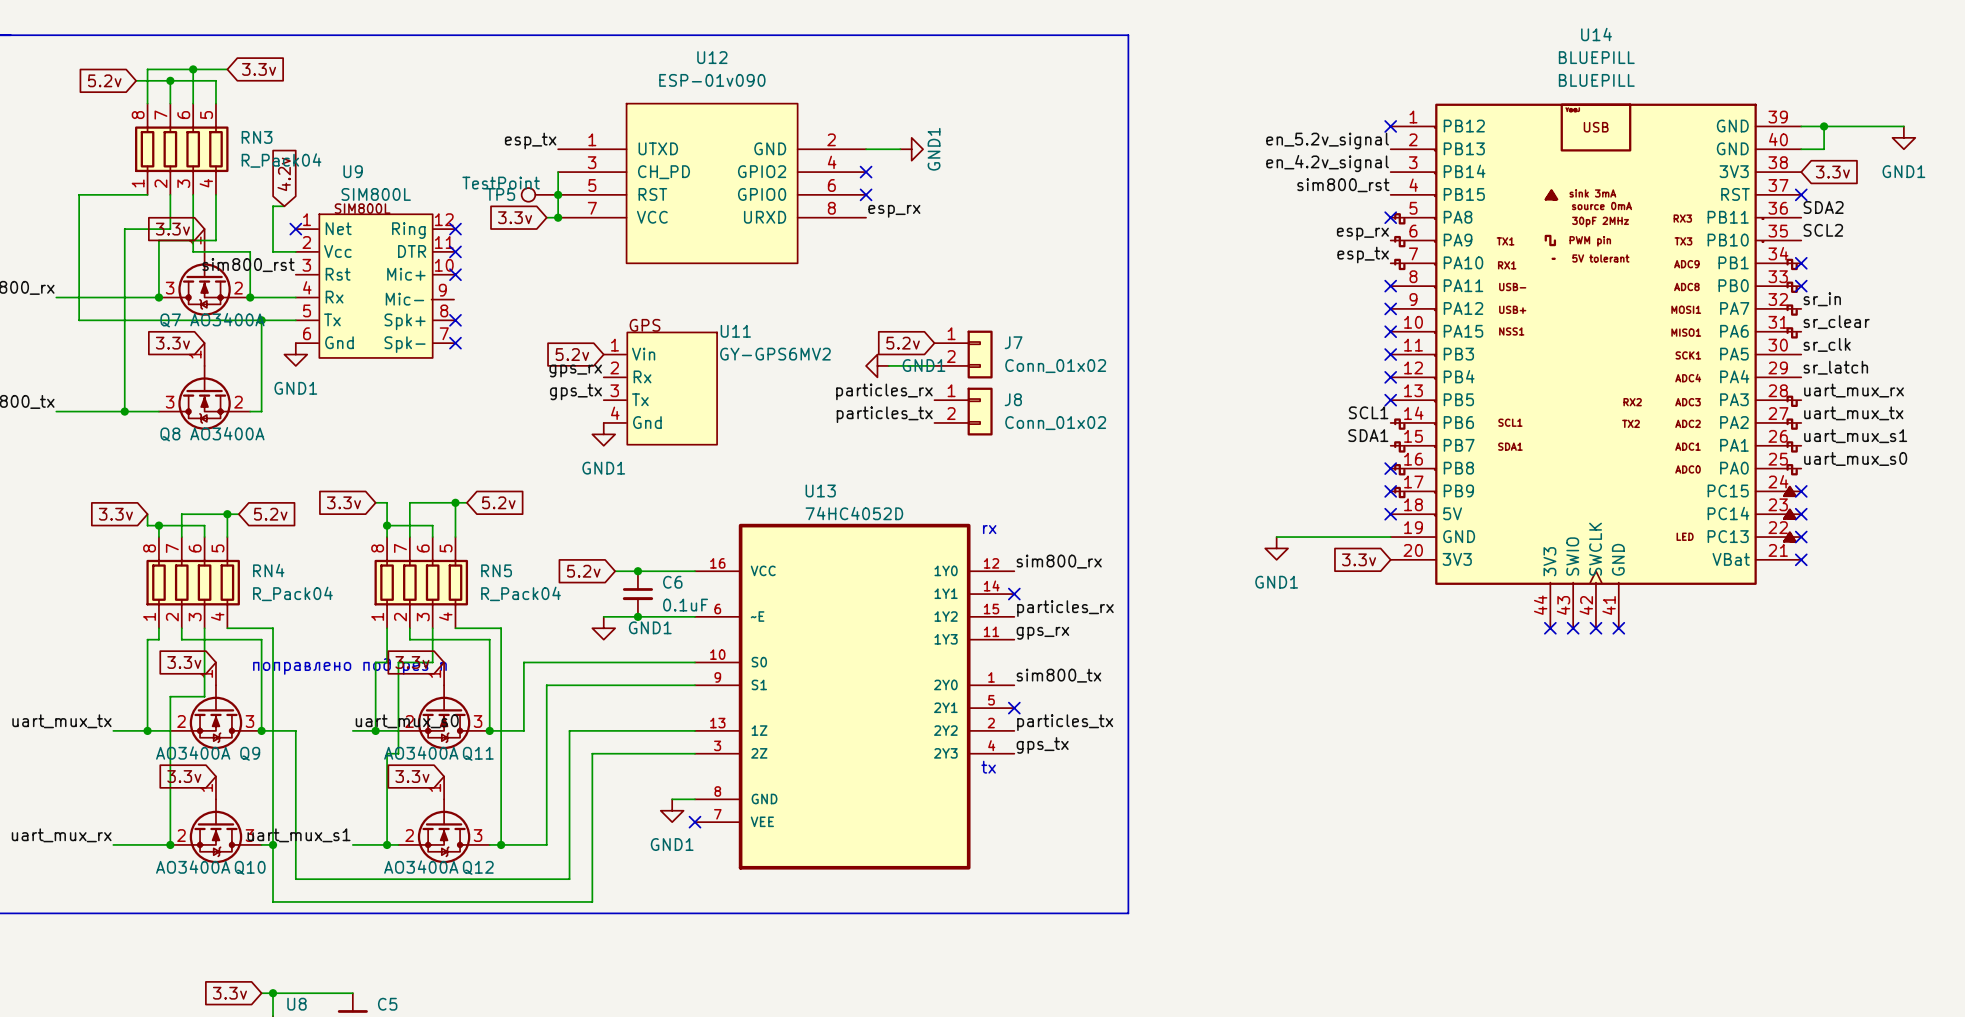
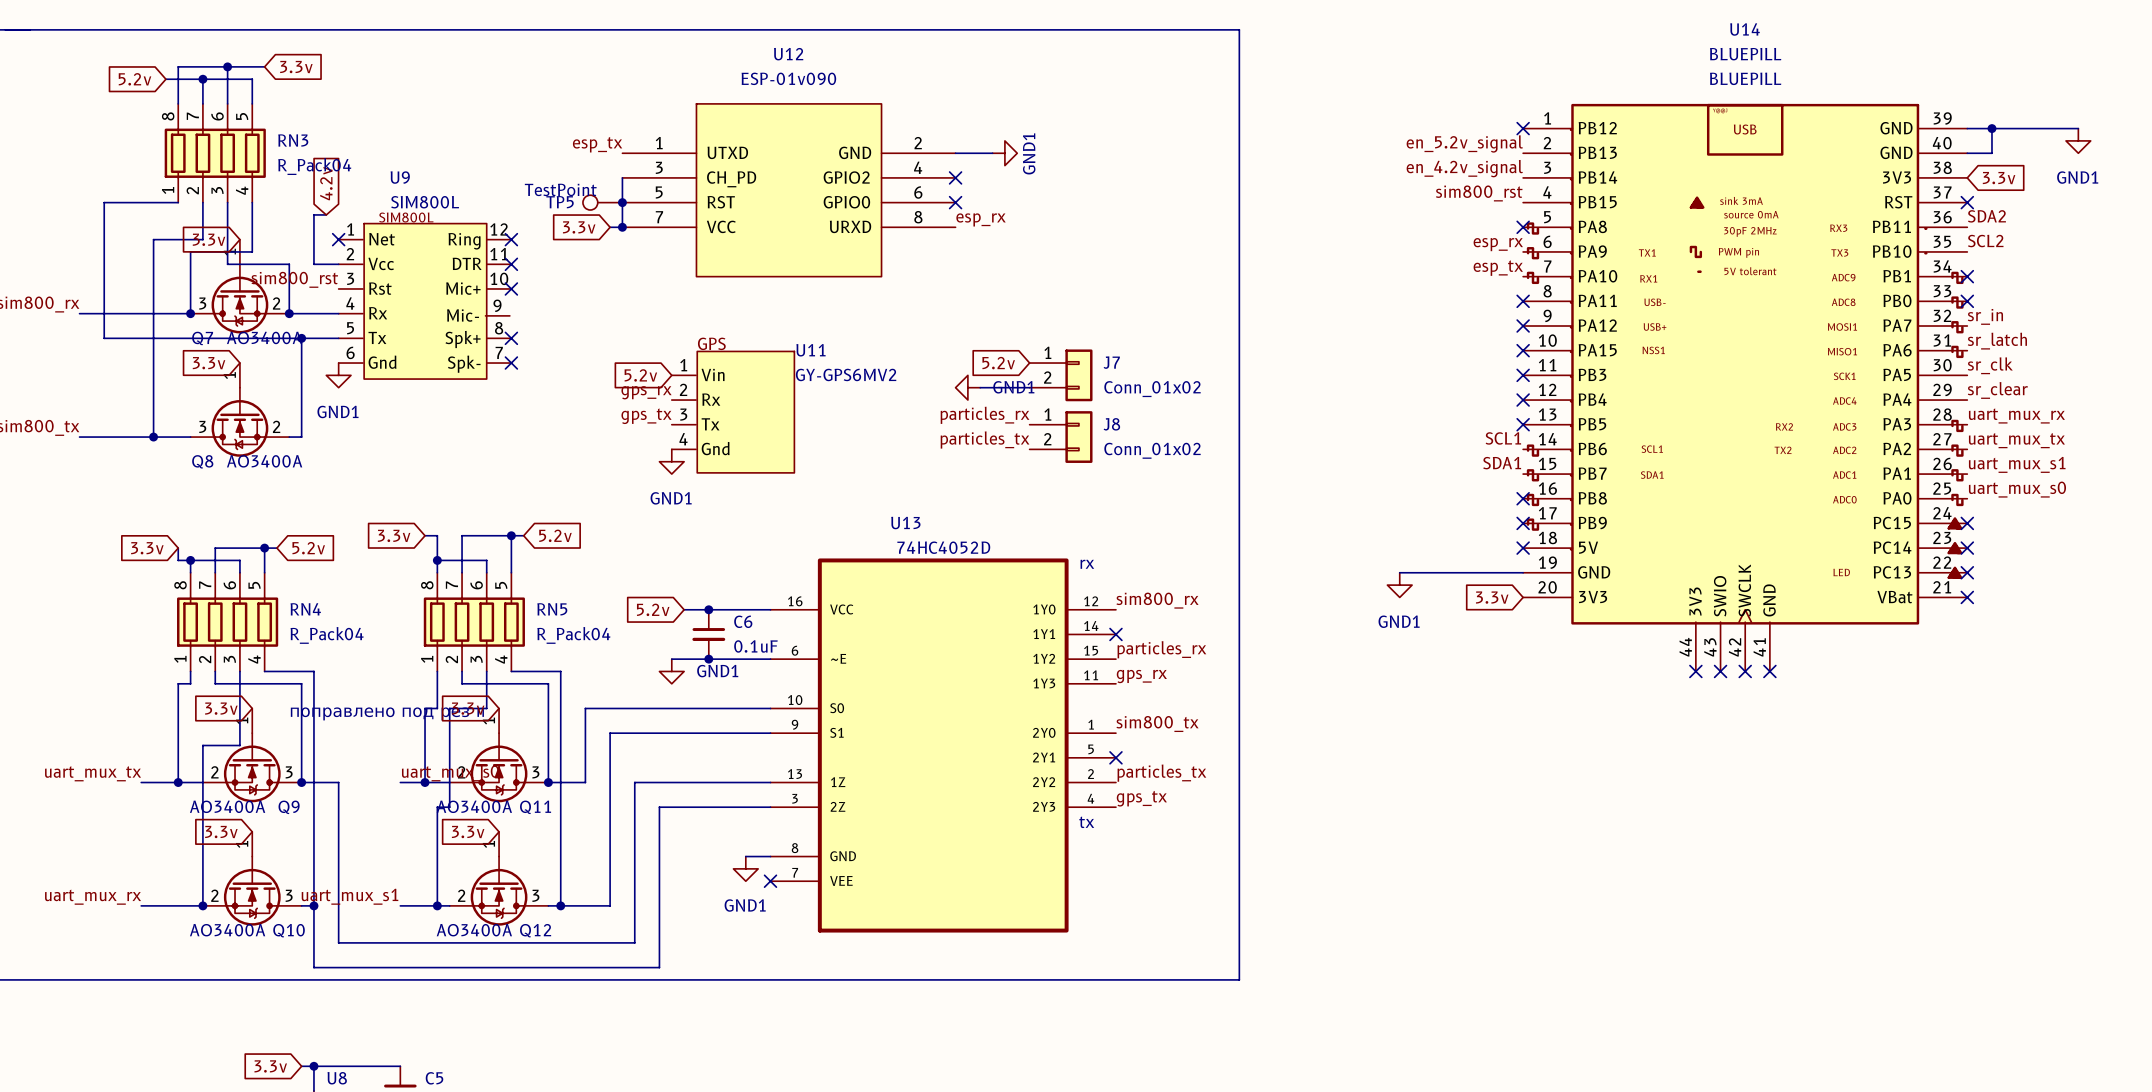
label: sr_clear (1836, 322) -> sr_latch (1997, 341)
label: sr_latch (1835, 367) -> sr_clear (1997, 390)

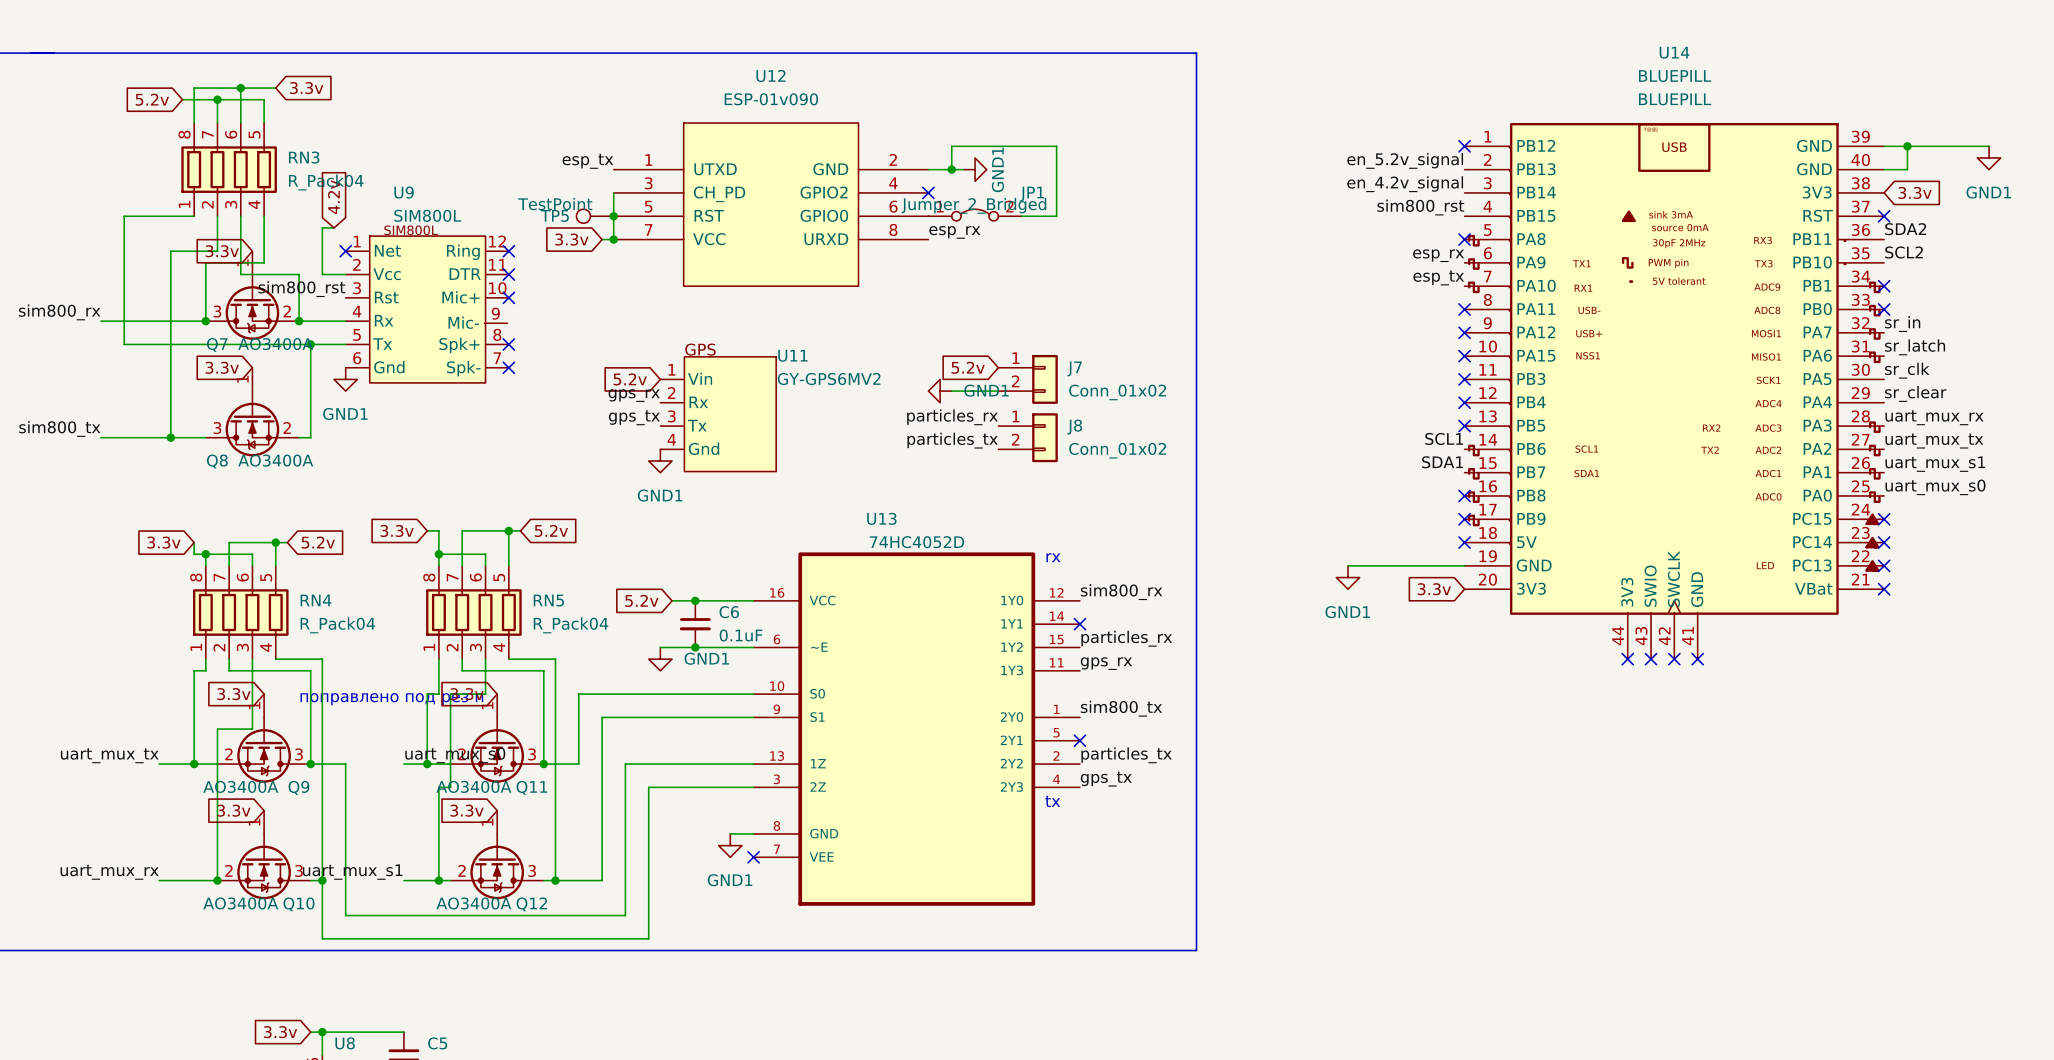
wire: none -> (951, 169) (951, 146) (1056, 146) (1056, 216) (1021, 216)
junction: none -> (951, 169)
JP1: none -> Jumper_2_Bridged (975, 215)
no-connect mark: (955, 202) -> none

